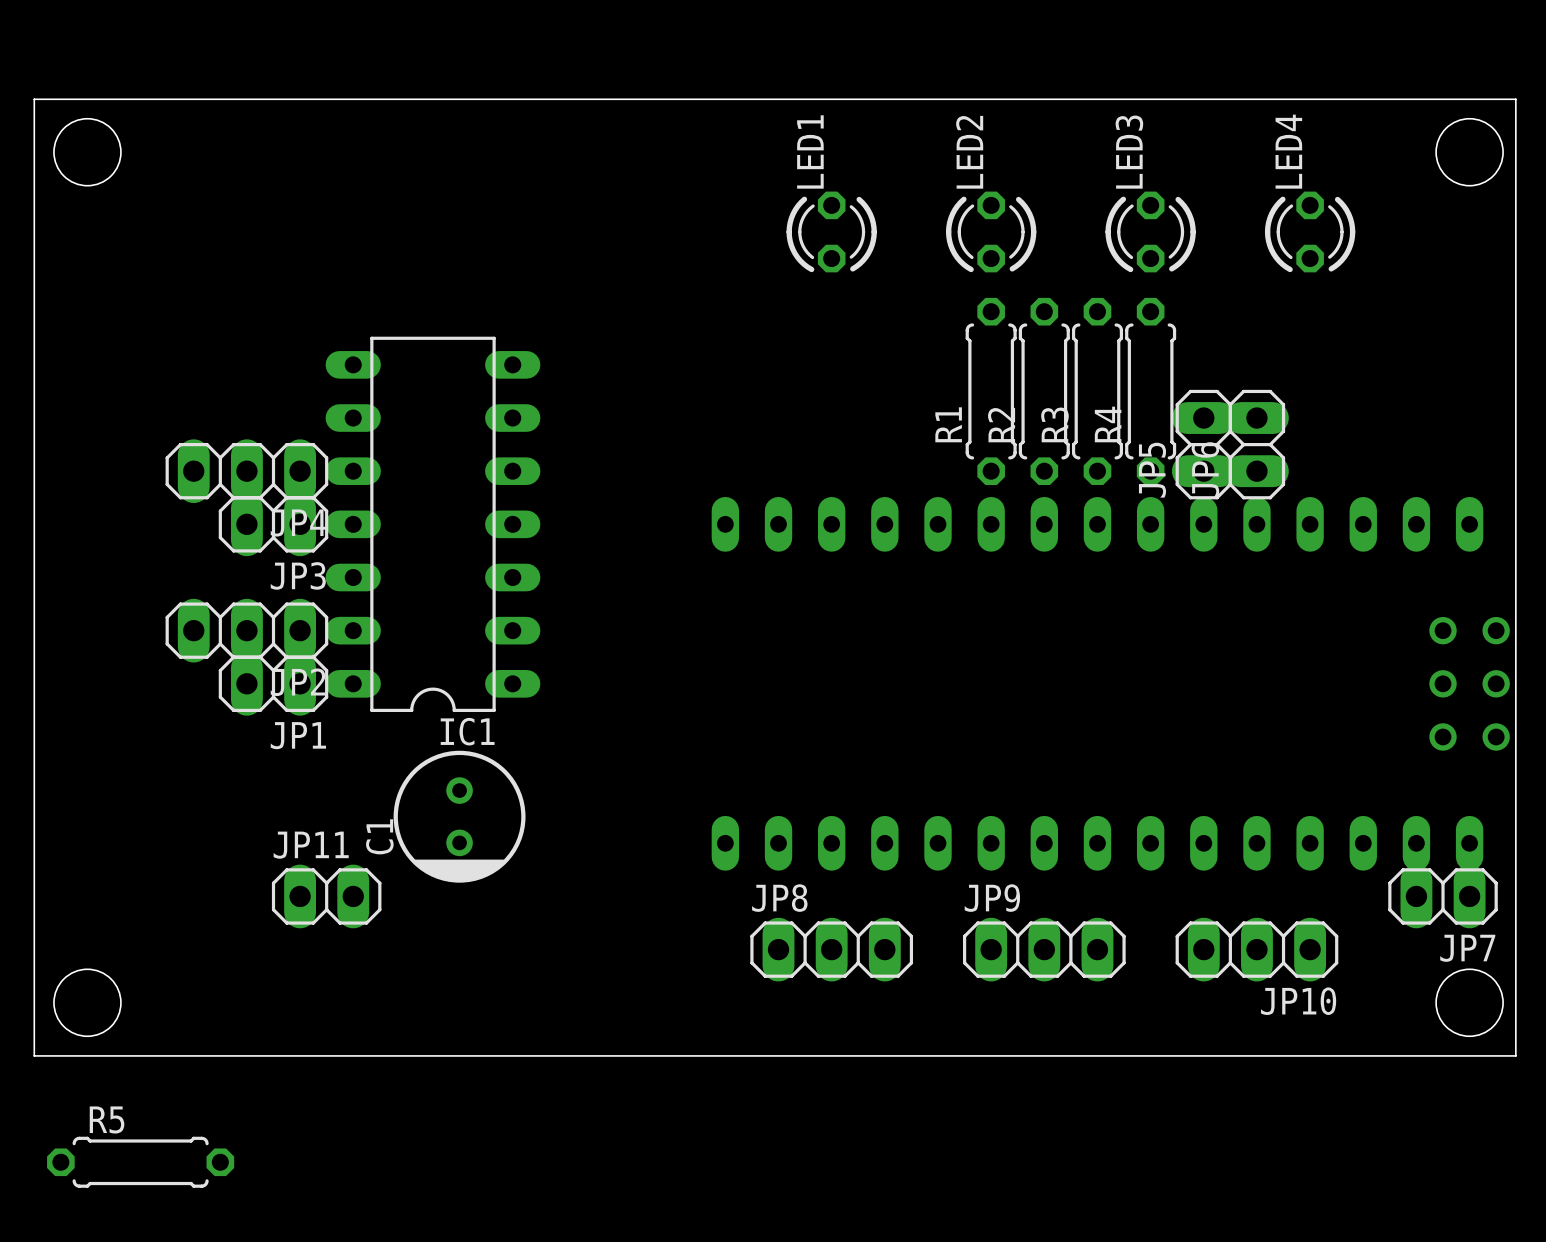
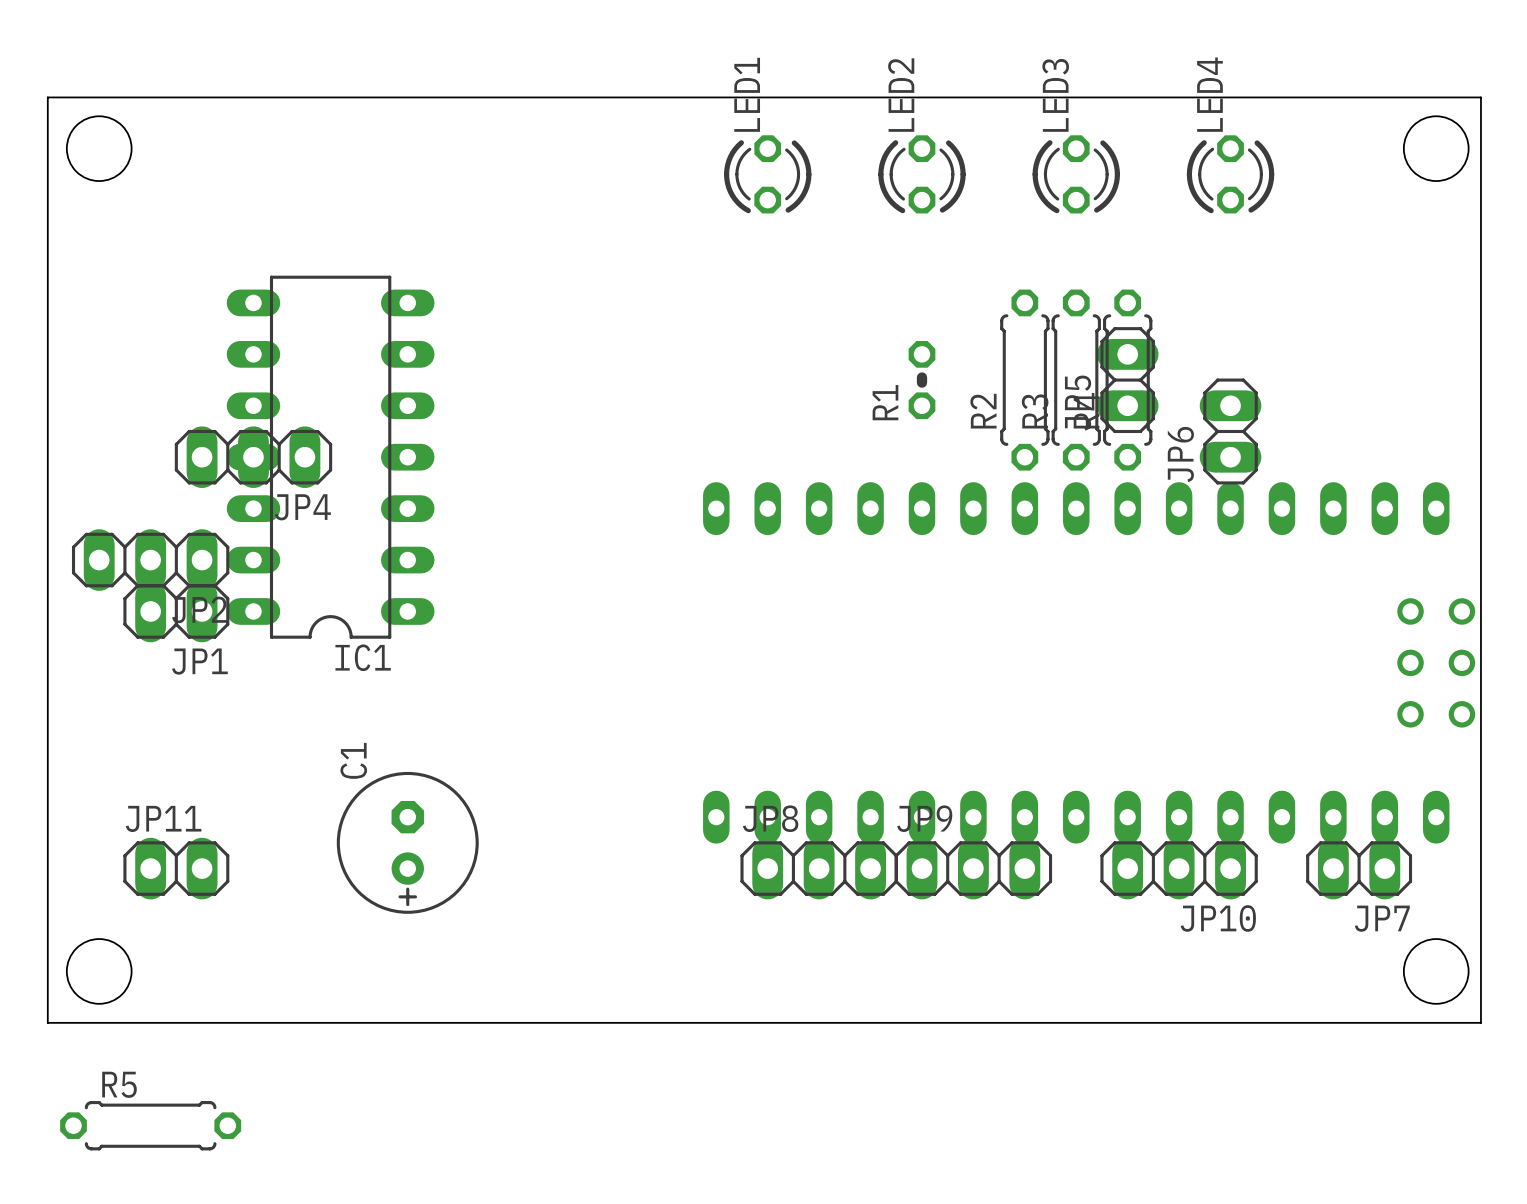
LED1 position: (831, 231) -> (767, 174)
LED2 position: (991, 231) -> (921, 174)
LED3 position: (1150, 231) -> (1076, 174)
LED4 position: (1310, 231) -> (1230, 174)
R1 footprint: [965, 297, 1017, 486] -> [908, 340, 936, 420]
JP5 position: (1203, 444) -> (1127, 380)
JP3: (273, 524) -> none
IC1 position: (432, 524) -> (330, 457)
JP2 position: (246, 630) -> (150, 560)
JP1 position: (273, 683) -> (176, 611)
C1 footprint: [393, 750, 526, 883] -> [336, 771, 479, 914]
C1 name position: C1 (379, 836) -> C1 (353, 760)
JP11 position: (326, 896) -> (176, 868)
JP7 position: (1443, 896) -> (1359, 868)
JP8 position: (831, 949) -> (819, 868)
JP9 position: (1044, 949) -> (973, 868)
JP10 position: (1256, 949) -> (1179, 868)

